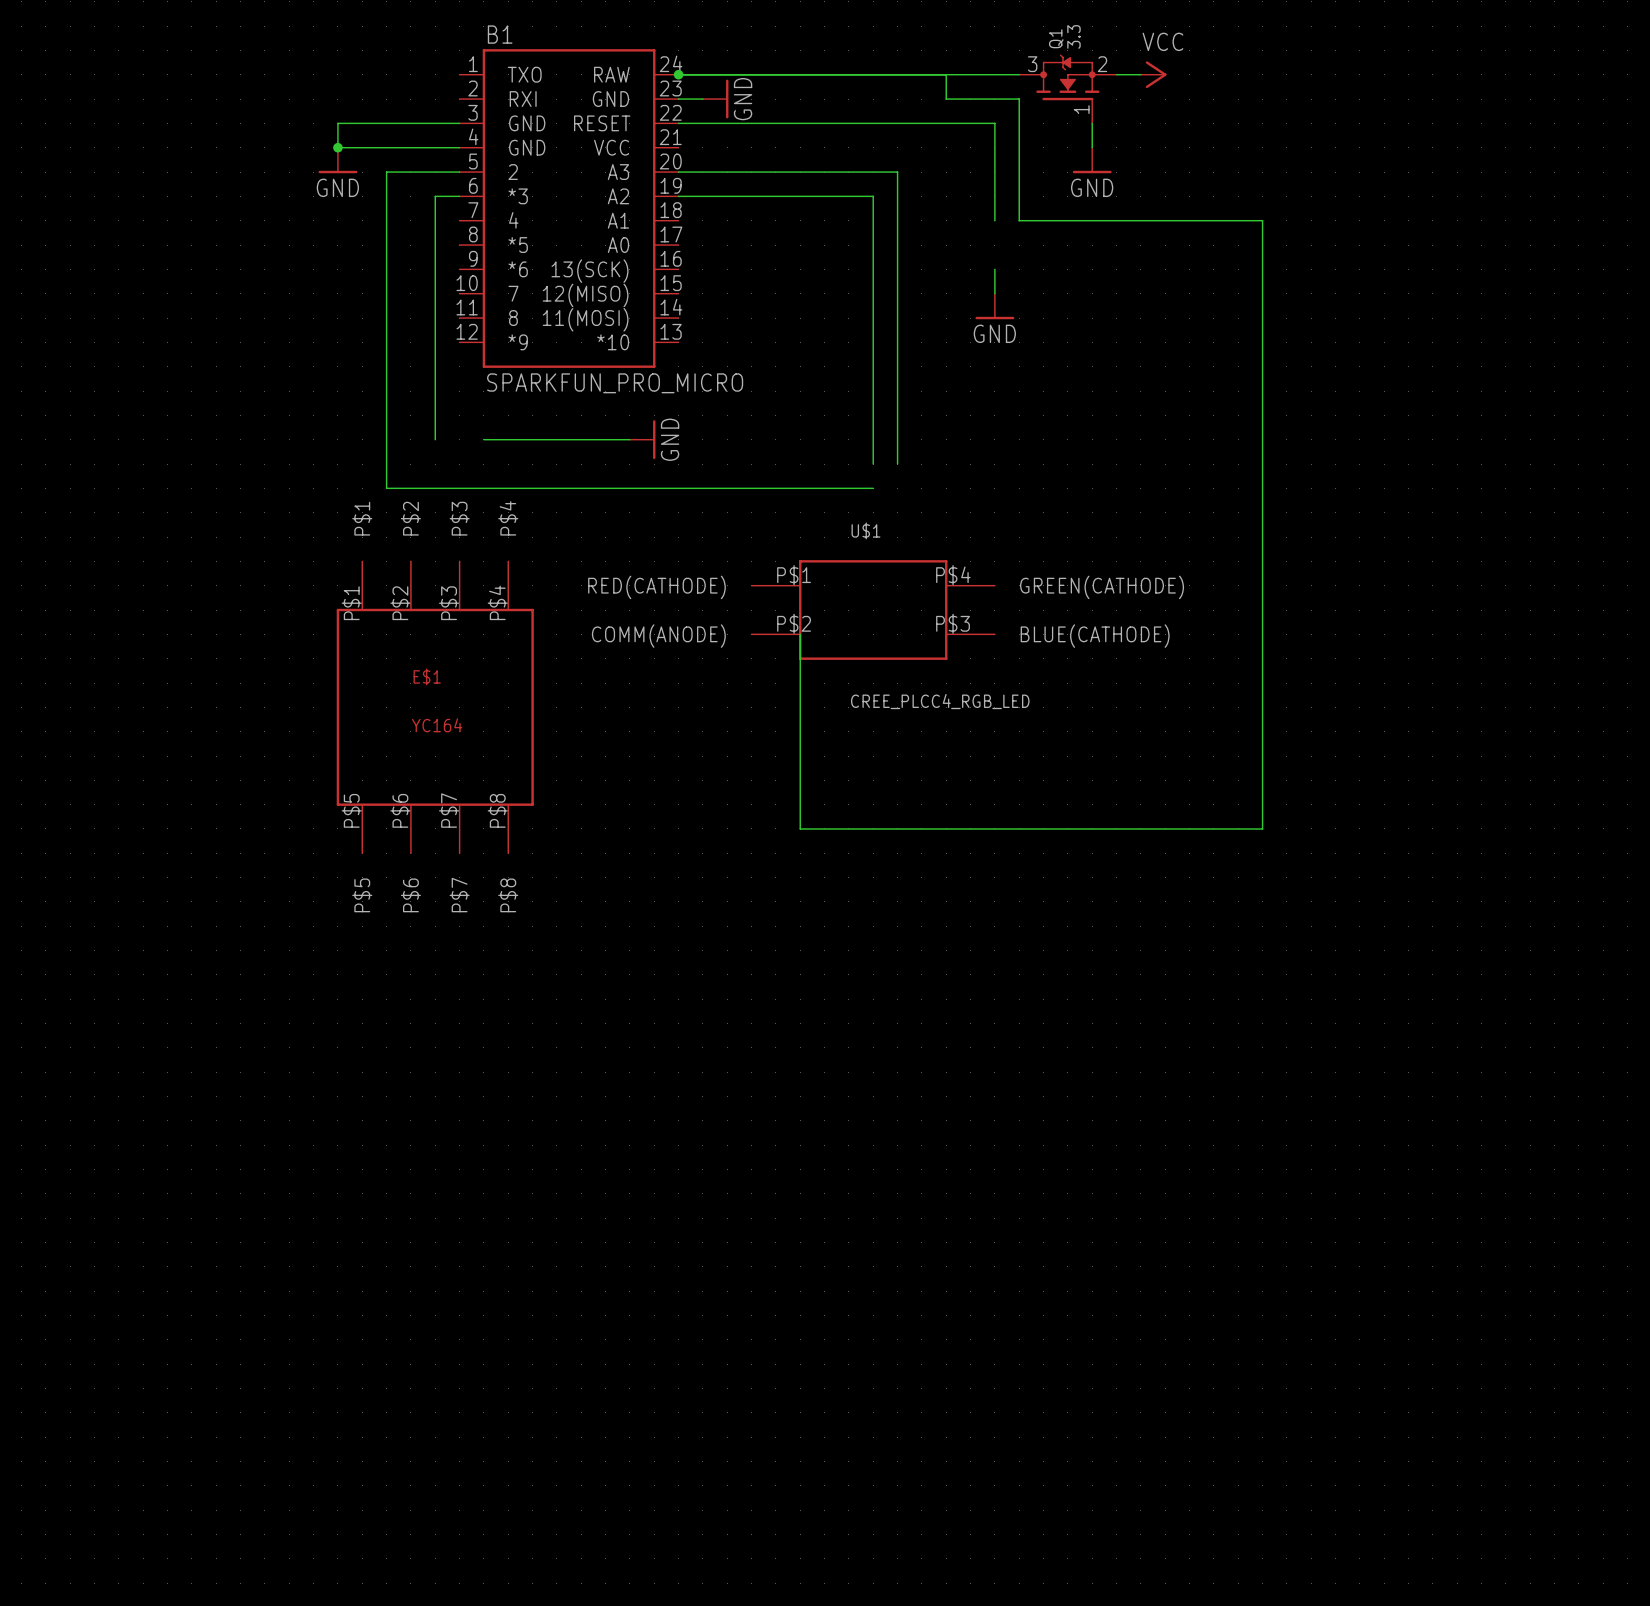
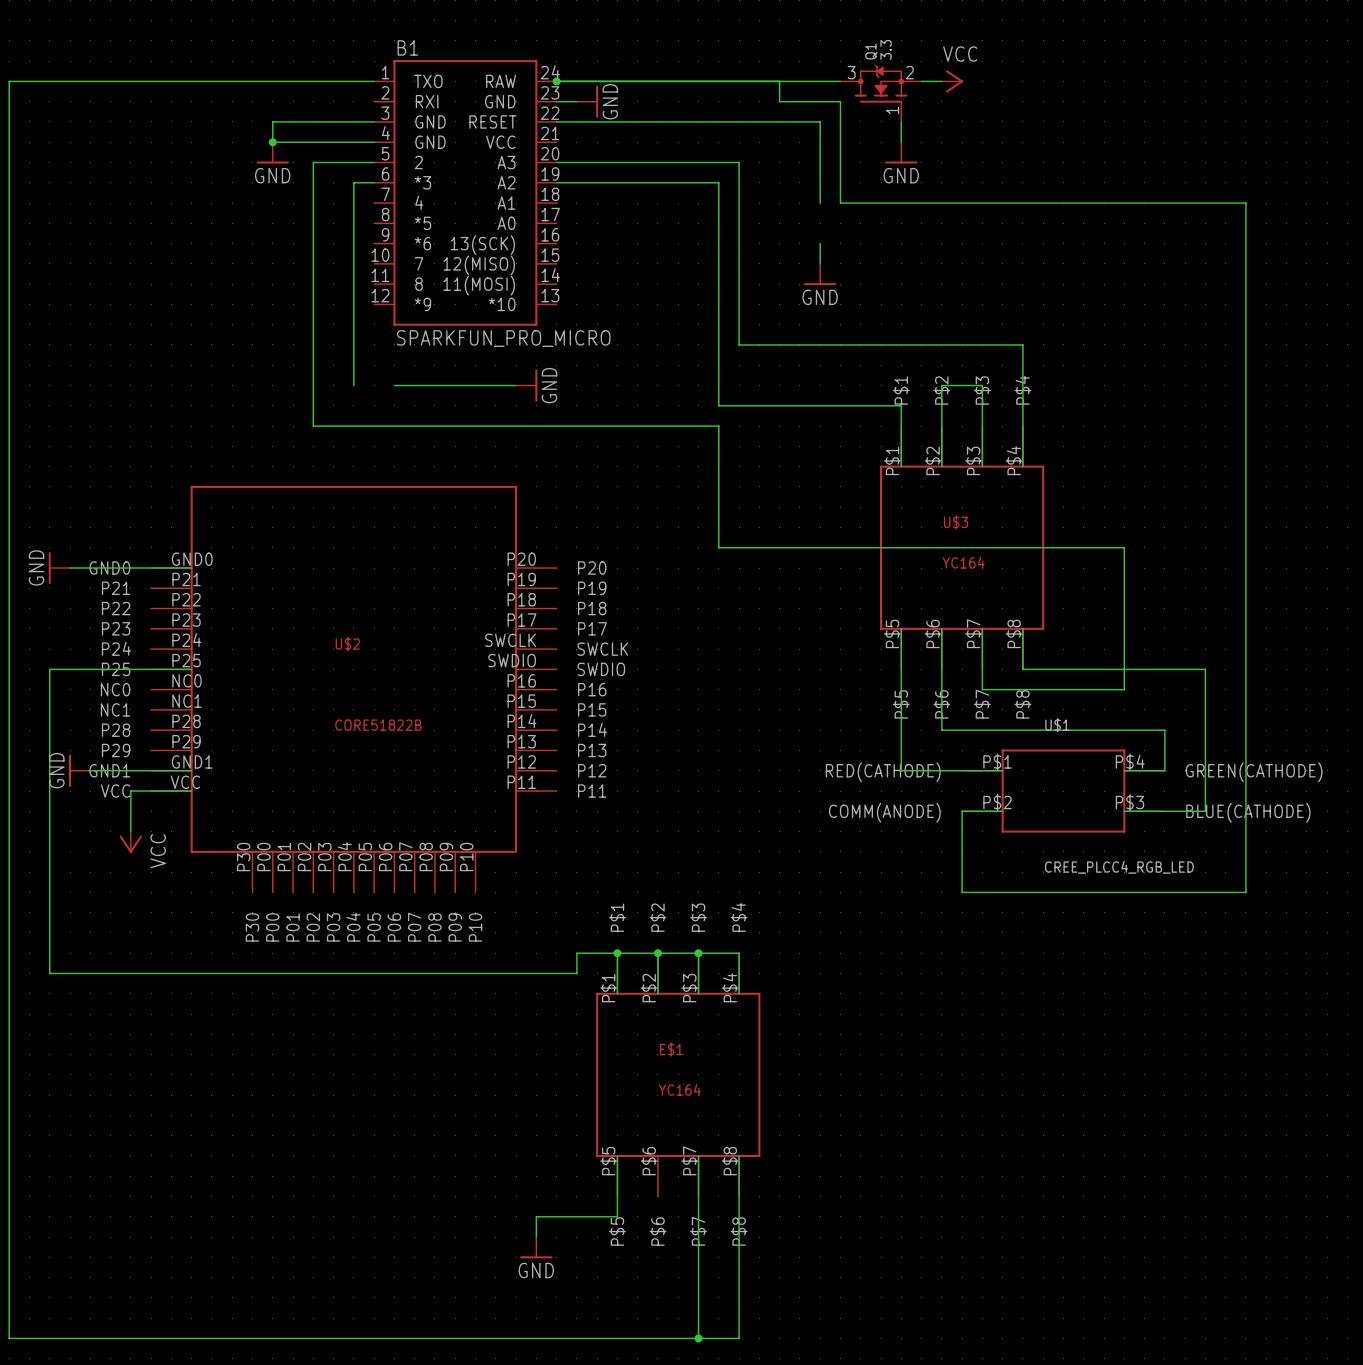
wire: none -> (374, 81) (9, 81) (9, 1338) (739, 1338) (739, 1155)
wire: (1262, 220) (1262, 828) (800, 828) (800, 634) -> (1043, 203) (1245, 203) (1245, 892) (962, 892) (962, 811) (1002, 811)
wire: (897, 391) (897, 464) -> (739, 344) (1022, 344) (1022, 466)
wire: none -> (718, 405) (901, 405) (901, 466)
wire: none -> (718, 426) (718, 547) (1124, 547) (1124, 689) (982, 689) (982, 628)
wire: none -> (941, 466) (941, 385) (982, 385) (982, 466)
U$1 position: (873, 610) -> (1063, 791)
U$3: none -> YC164 (962, 547)
power symbol: none -> GND (59, 568)
wire: none -> (70, 568) (191, 568)
E$1 position: (435, 707) -> (678, 1074)
wire: none -> (901, 628) (901, 770) (1002, 770)
wire: none -> (941, 628) (941, 730) (1164, 730) (1164, 770) (1124, 770)
wire: none -> (1022, 628) (1022, 669) (1205, 669) (1205, 811) (1124, 811)
wire: none -> (191, 669) (49, 669) (49, 973) (576, 973) (576, 953) (739, 953) (739, 993)
U$2: none -> CORE51822B (353, 689)
power symbol: none -> GND (79, 770)
wire: none -> (90, 770) (191, 770)
wire: none -> (191, 791) (130, 791) (130, 831)
power symbol: none -> VCC (130, 842)
wire: none -> (617, 953) (617, 993)
junction: none -> (617, 953)
wire: none -> (657, 953) (657, 993)
junction: none -> (657, 953)
wire: none -> (698, 953) (698, 993)
junction: none -> (698, 953)
wire: none -> (617, 1155) (617, 1216) (536, 1216) (536, 1237)
wire: none -> (698, 1155) (698, 1338)
power symbol: none -> GND (536, 1247)
junction: none -> (698, 1338)

